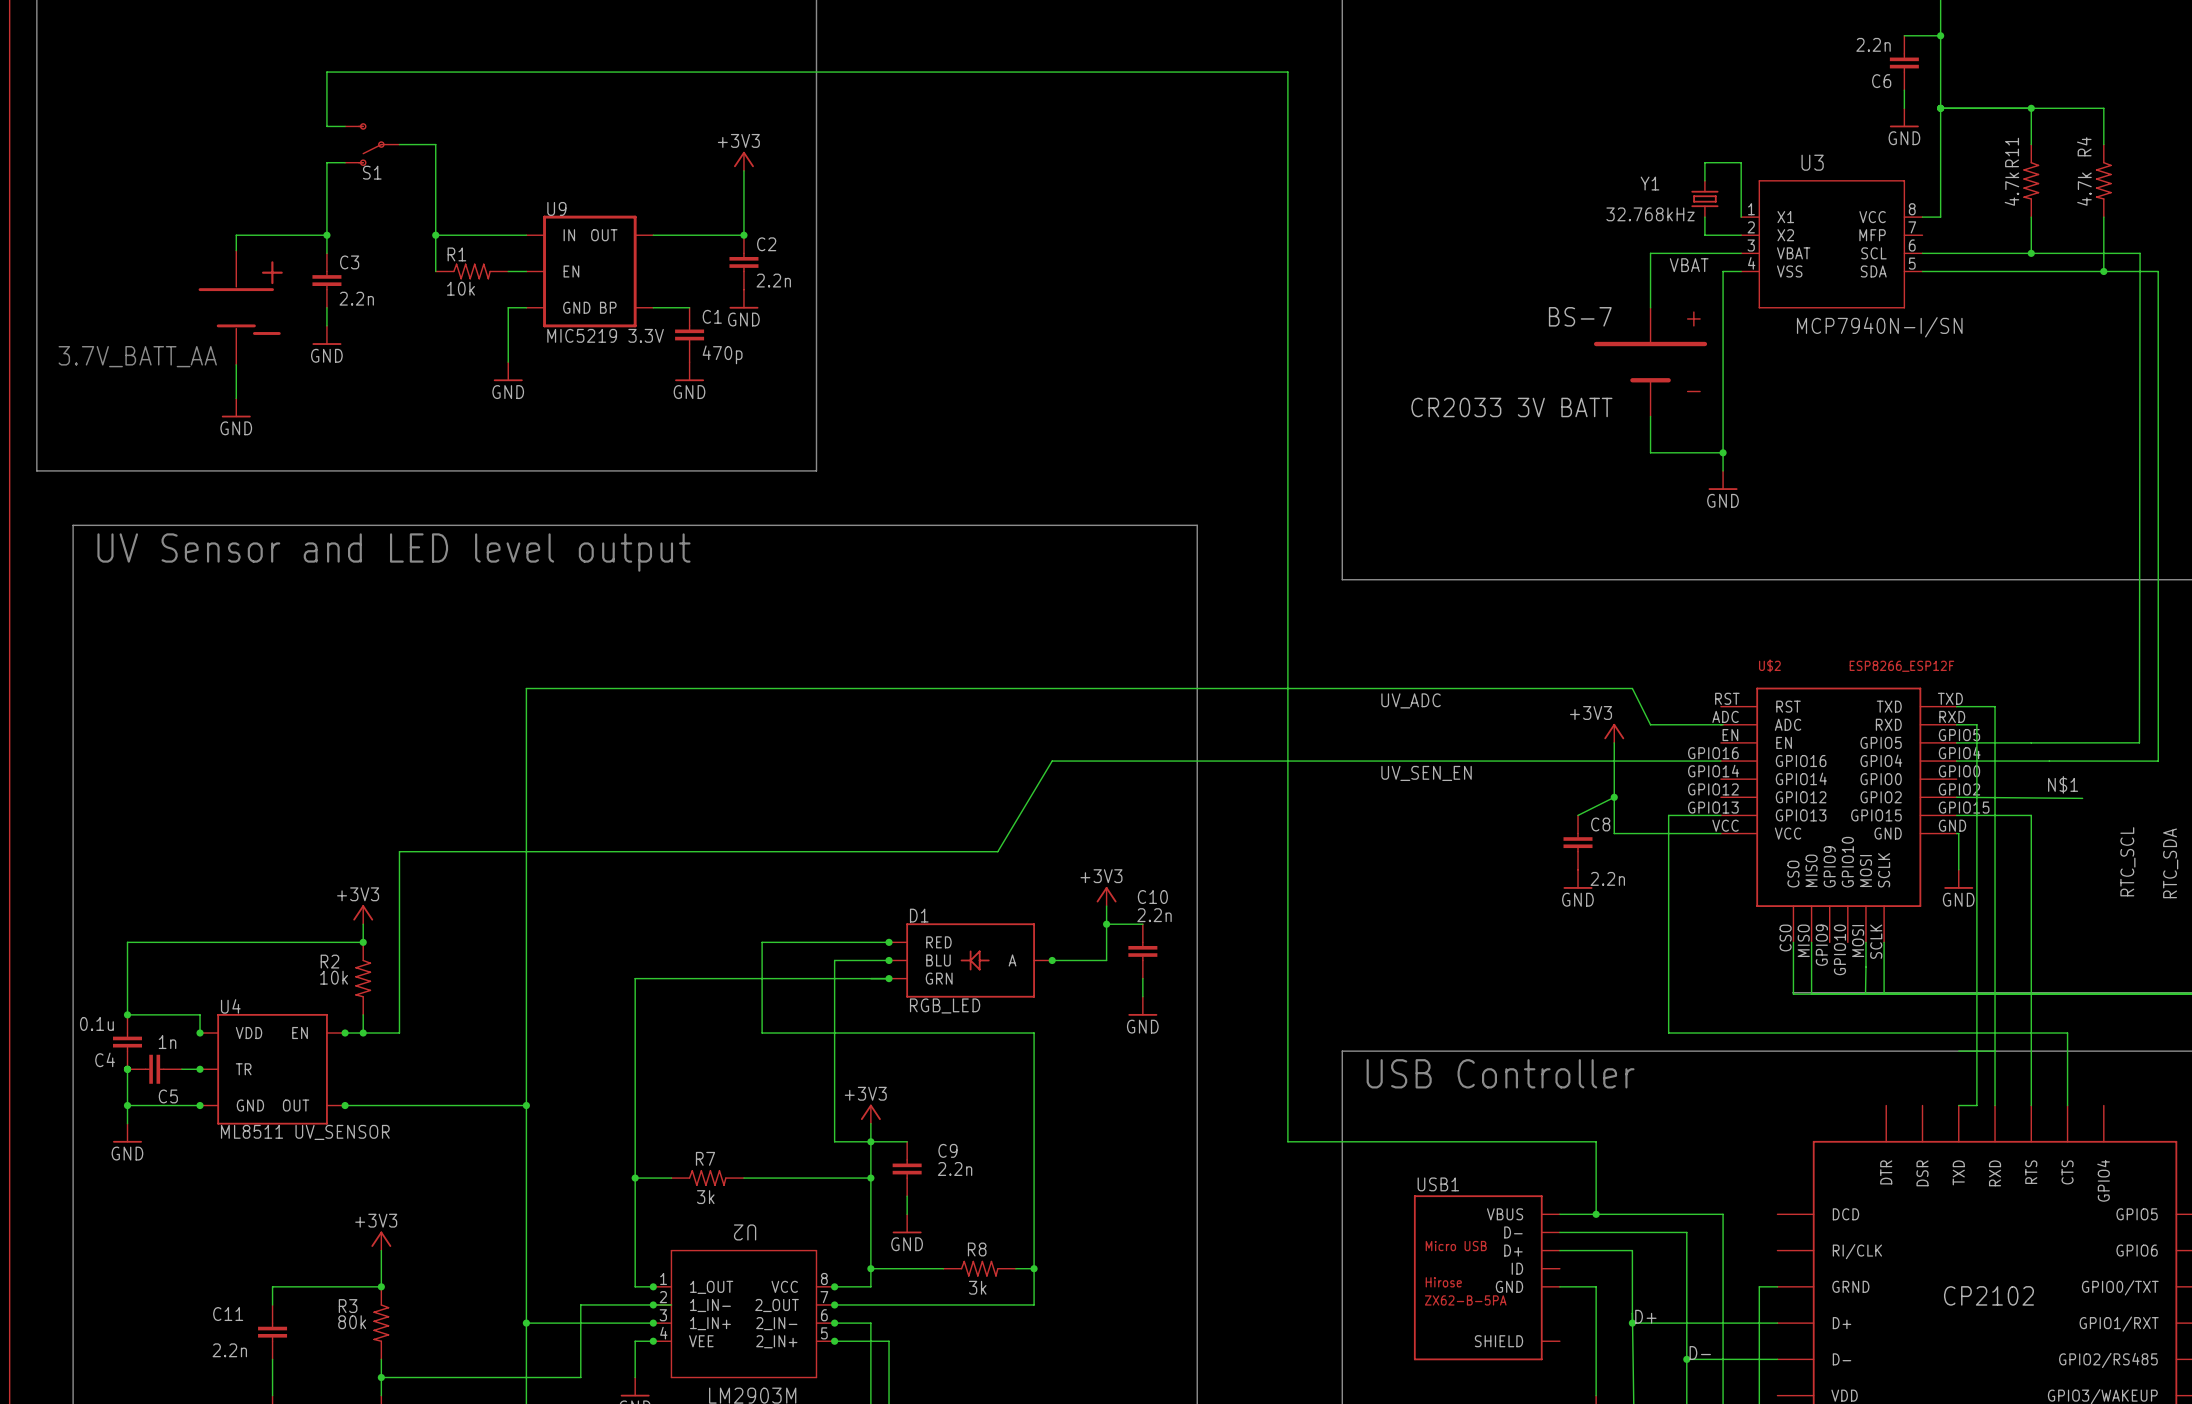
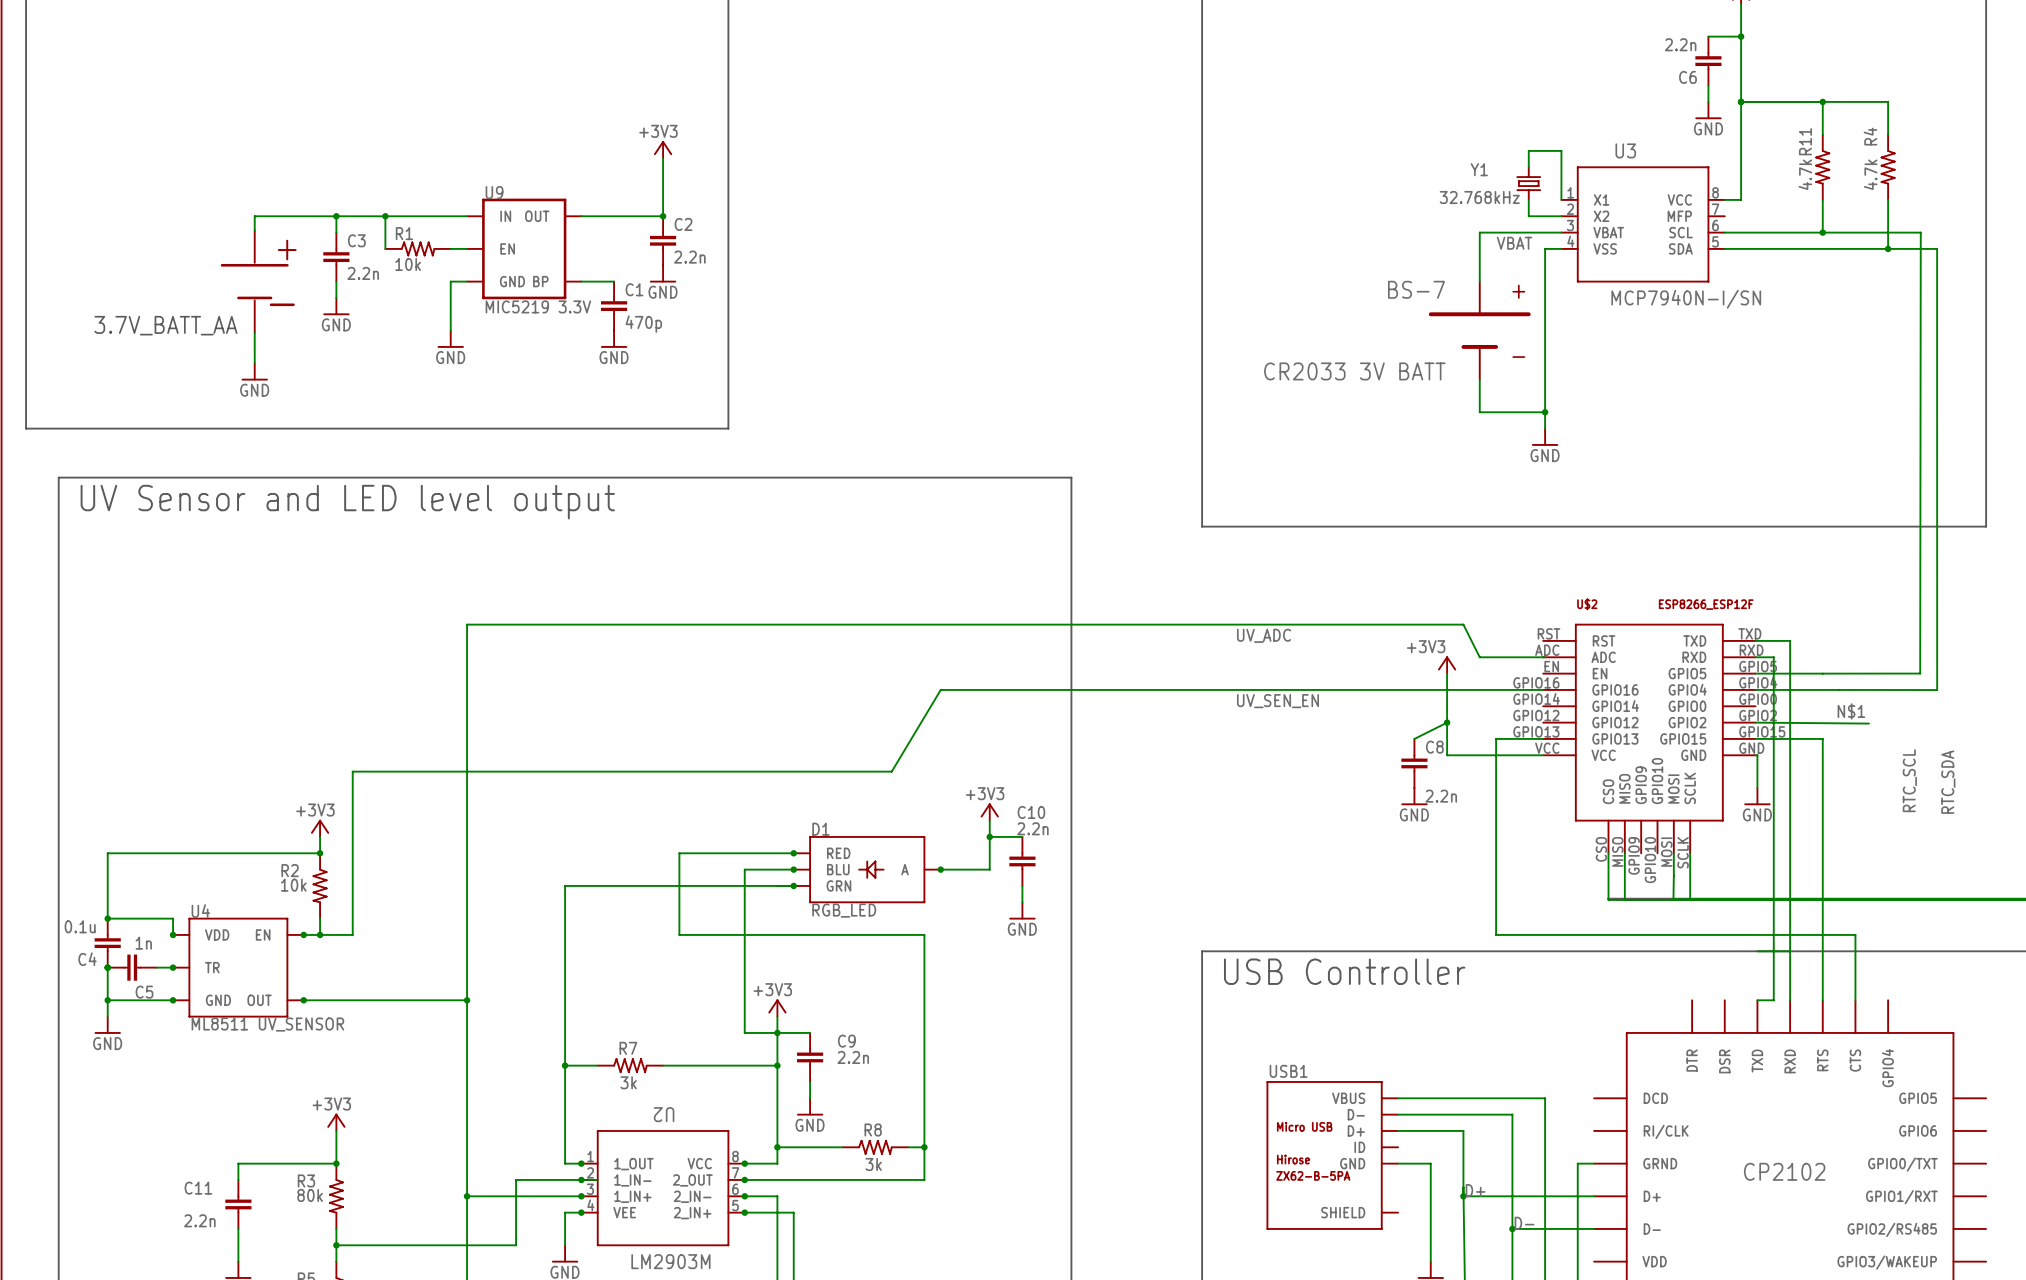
wire: (345, 126) (326, 126) (326, 72) (1287, 72) (1287, 1141) (1596, 1141) (1596, 1214) -> none
S1: (372, 144) -> none
wire: (399, 144) (435, 144) (435, 235) -> (287, 216) (385, 216)
wire: (345, 162) (326, 162) (326, 253) -> none
wire: (290, 235) (236, 235) (236, 250) -> (254, 216) (254, 230)
junction: (326, 235) -> none
wire: none -> (336, 216) (336, 232)
junction: none -> (336, 216)
C3 position: (326, 280) -> (336, 257)
part position: (236, 307) -> (254, 281)
wire: (326, 307) (326, 325) -> (336, 281) (336, 297)
power symbol: GND (326, 335) -> none
power symbol: none -> GND (336, 306)
wire: (236, 364) (236, 398) -> (254, 333) (254, 363)
power symbol: GND (236, 407) -> none
power symbol: none -> GND (254, 371)
junction: (1596, 1214) -> none

